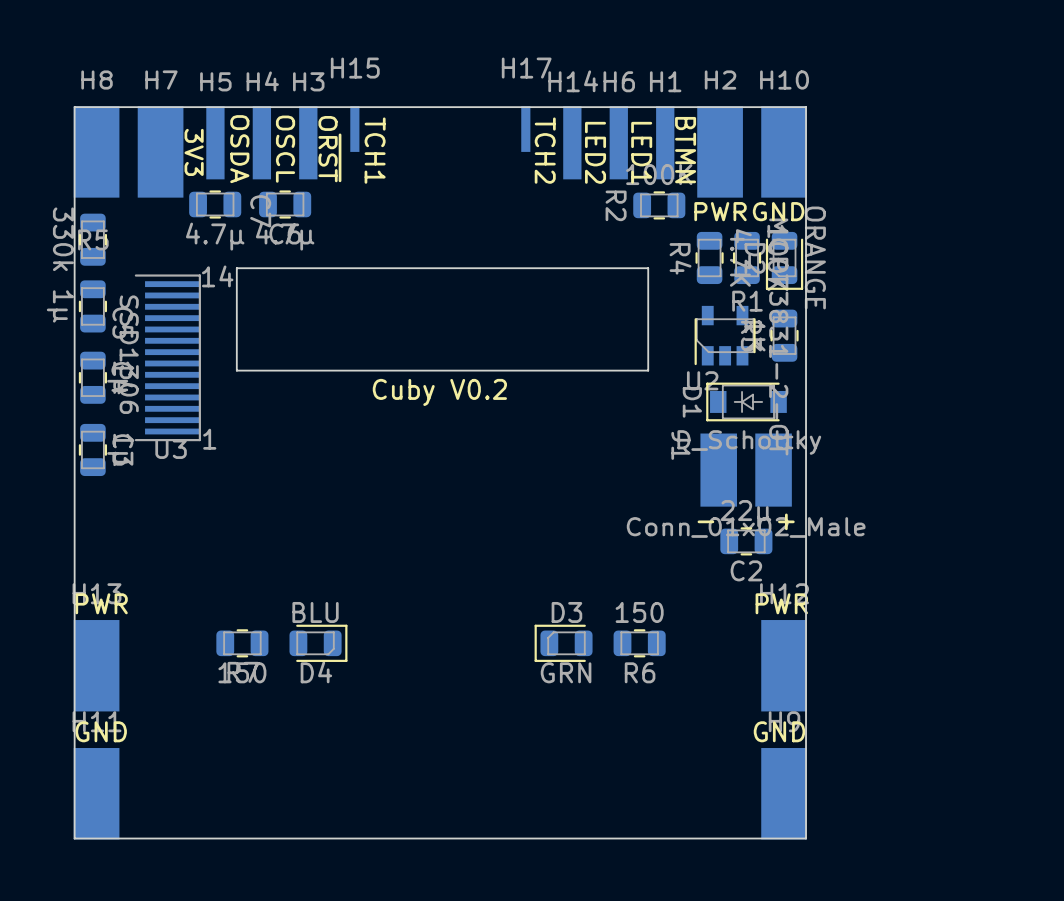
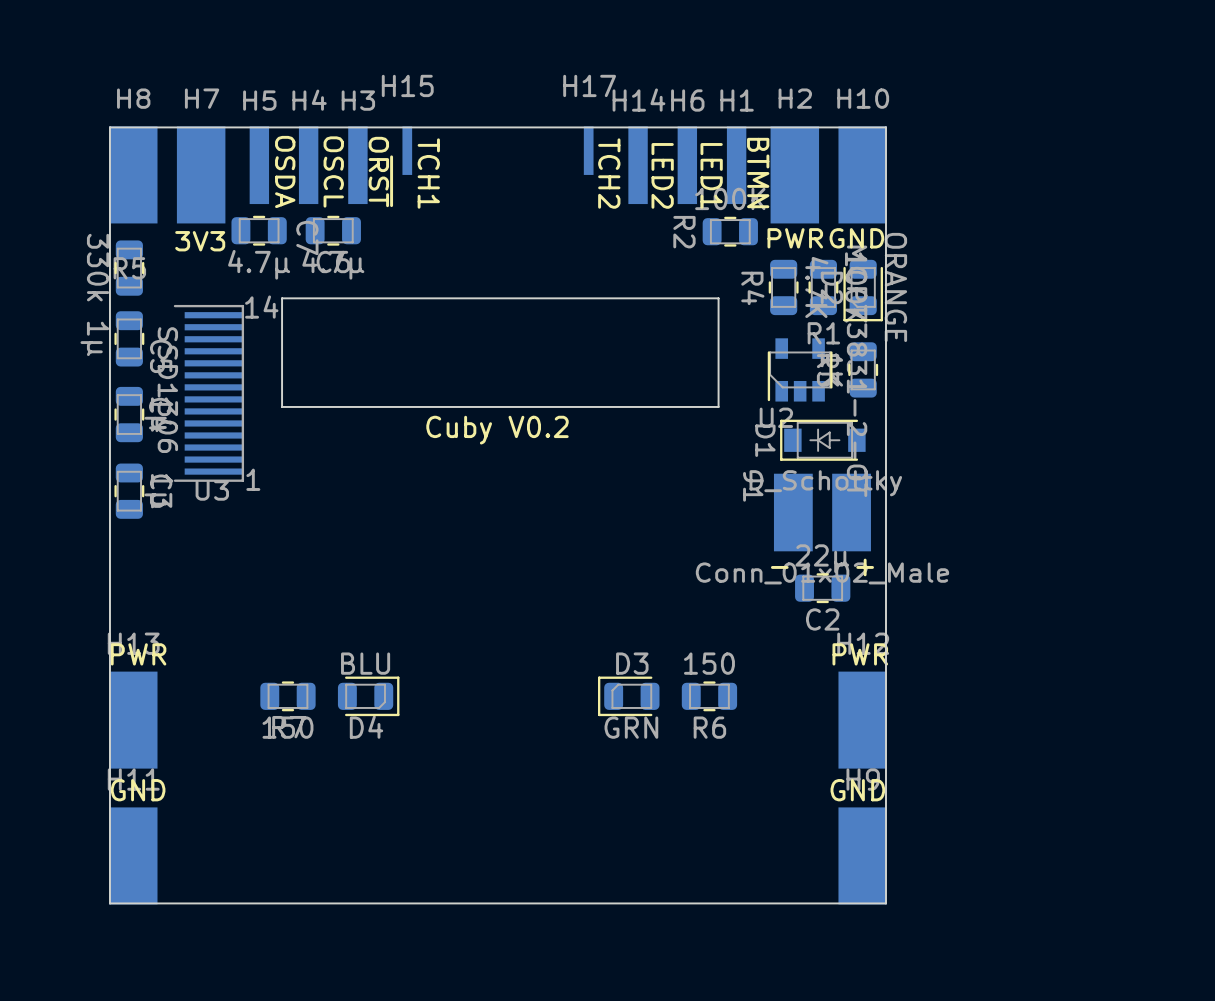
H7 value rotation: 0° (194, 152) -> 90° counterclockwise (200, 241)
H7 value position: 3V3 (194, 152) -> 3V3 (200, 241)

